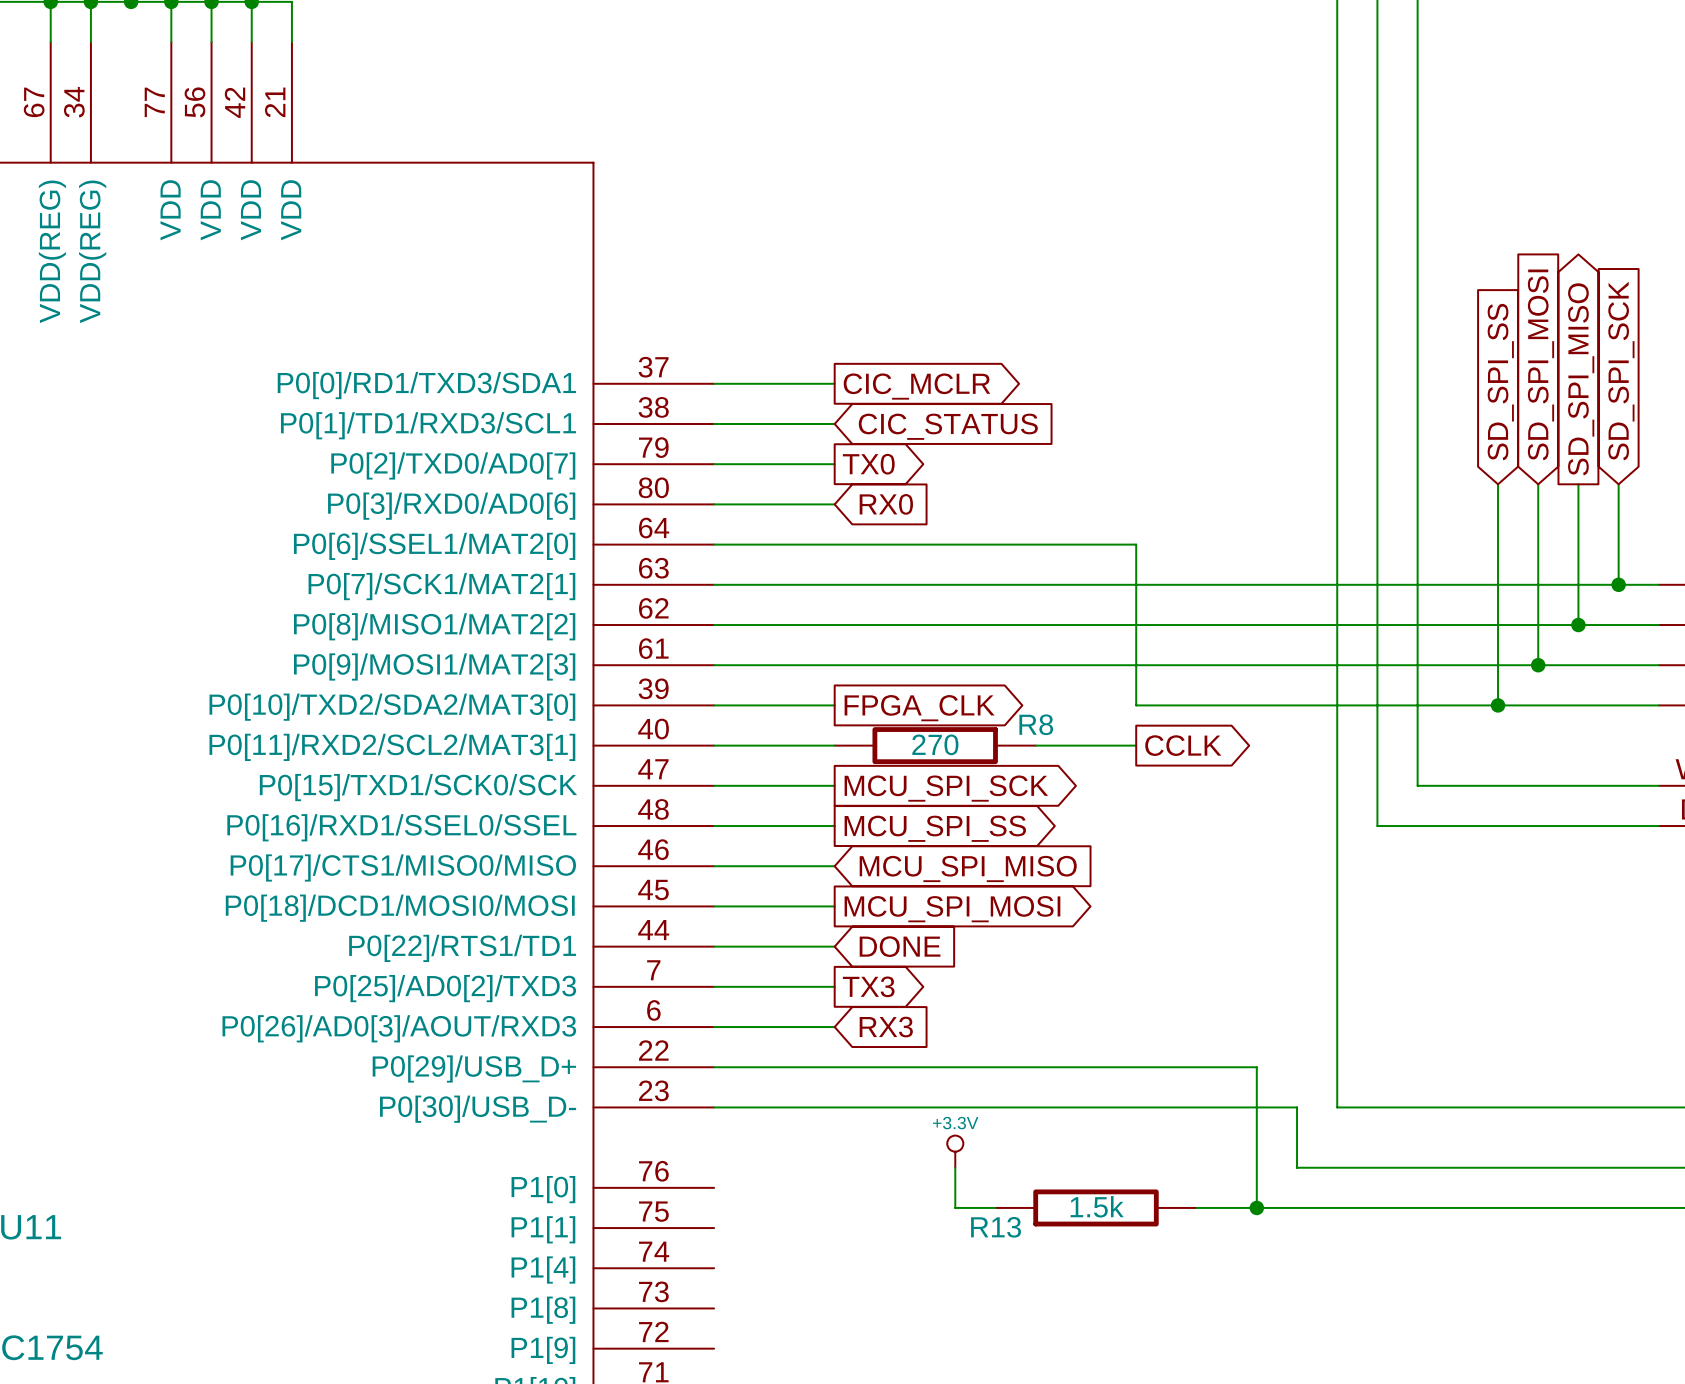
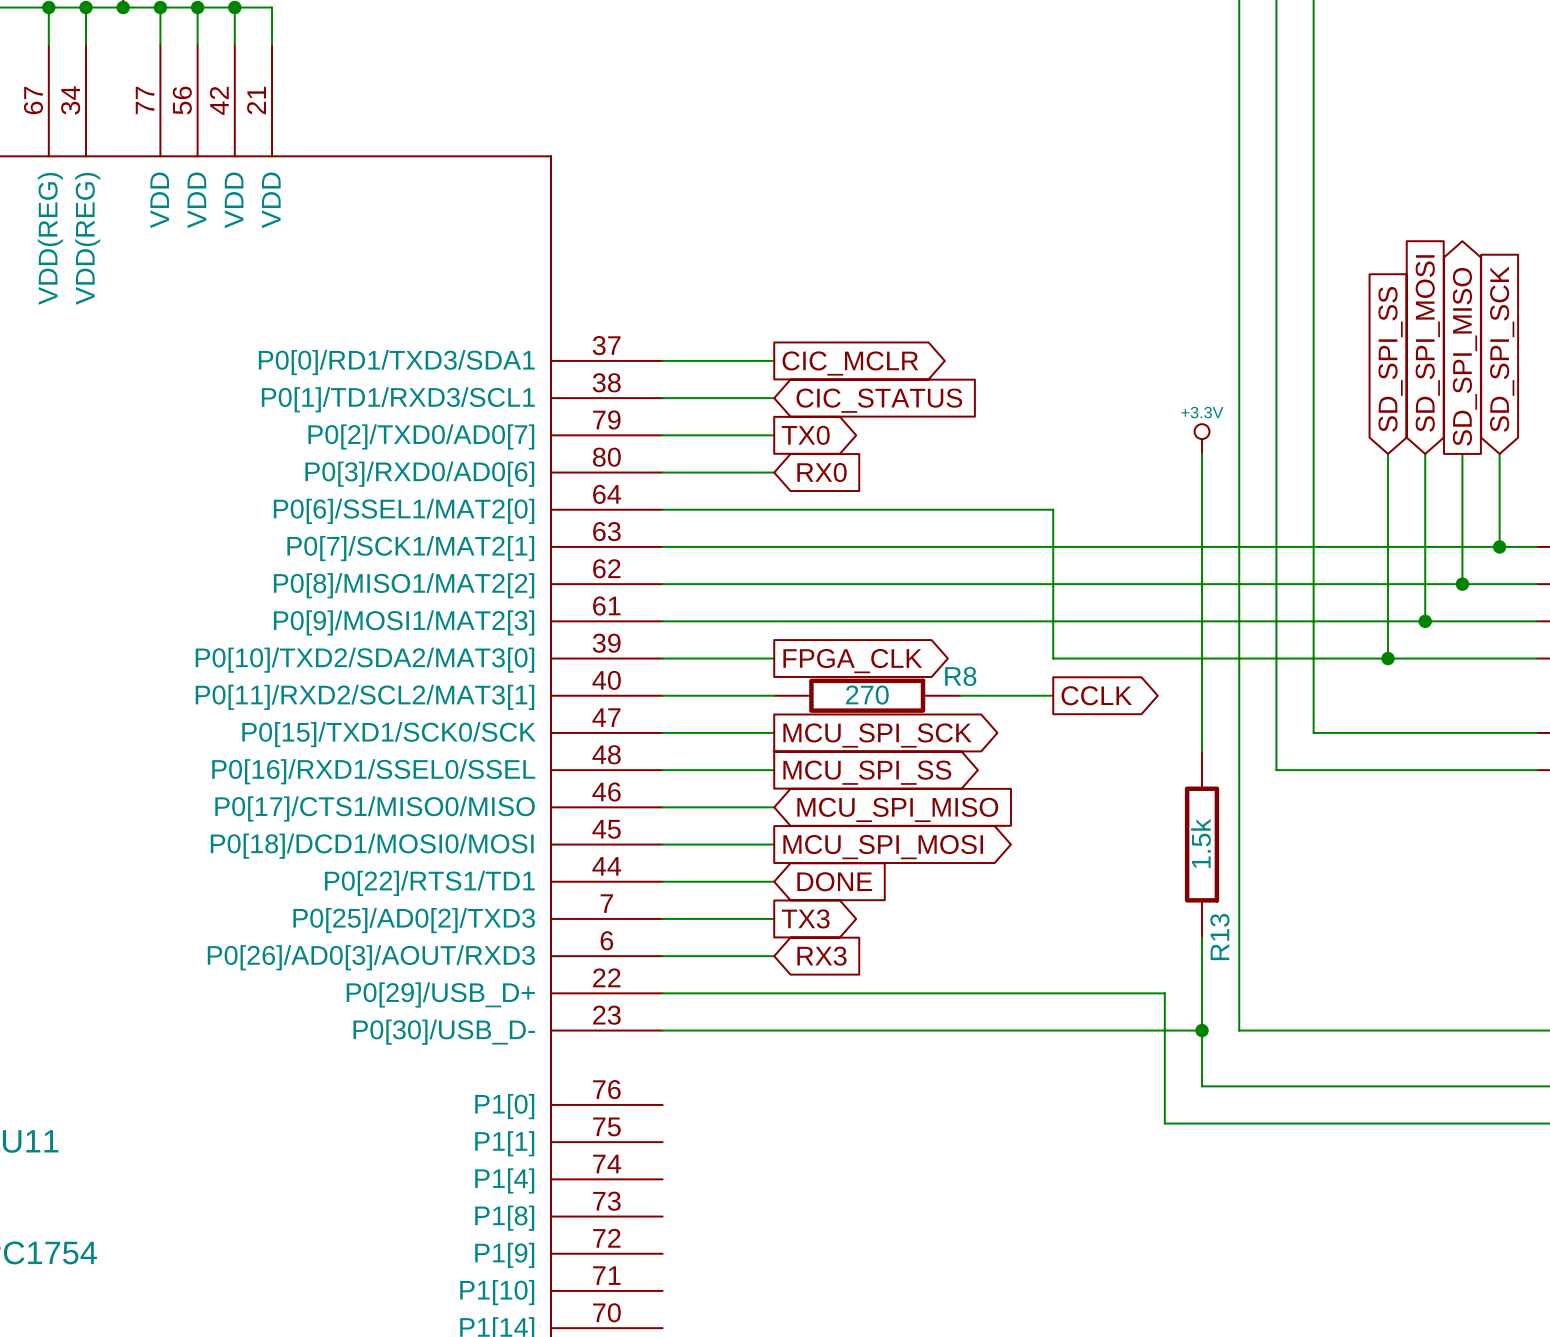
power symbol: none -> +3.3V (1202, 439)
wire: none -> (1202, 453) (1202, 751)
wire: none -> (1202, 937) (1202, 1030)
junction: none -> (1202, 1030)
power symbol: +3.3V (955, 1151) -> none
wire: (955, 1167) (955, 1207) (995, 1207) -> none
R13 rotation: 0° (1096, 1207) -> 90° clockwise (1202, 844)
R13 position: (1096, 1207) -> (1202, 844)
wire: (1196, 1207) (1256, 1207) -> none
junction: (1256, 1207) -> none
R13 name position: R13 (996, 1227) -> R13 (1219, 937)

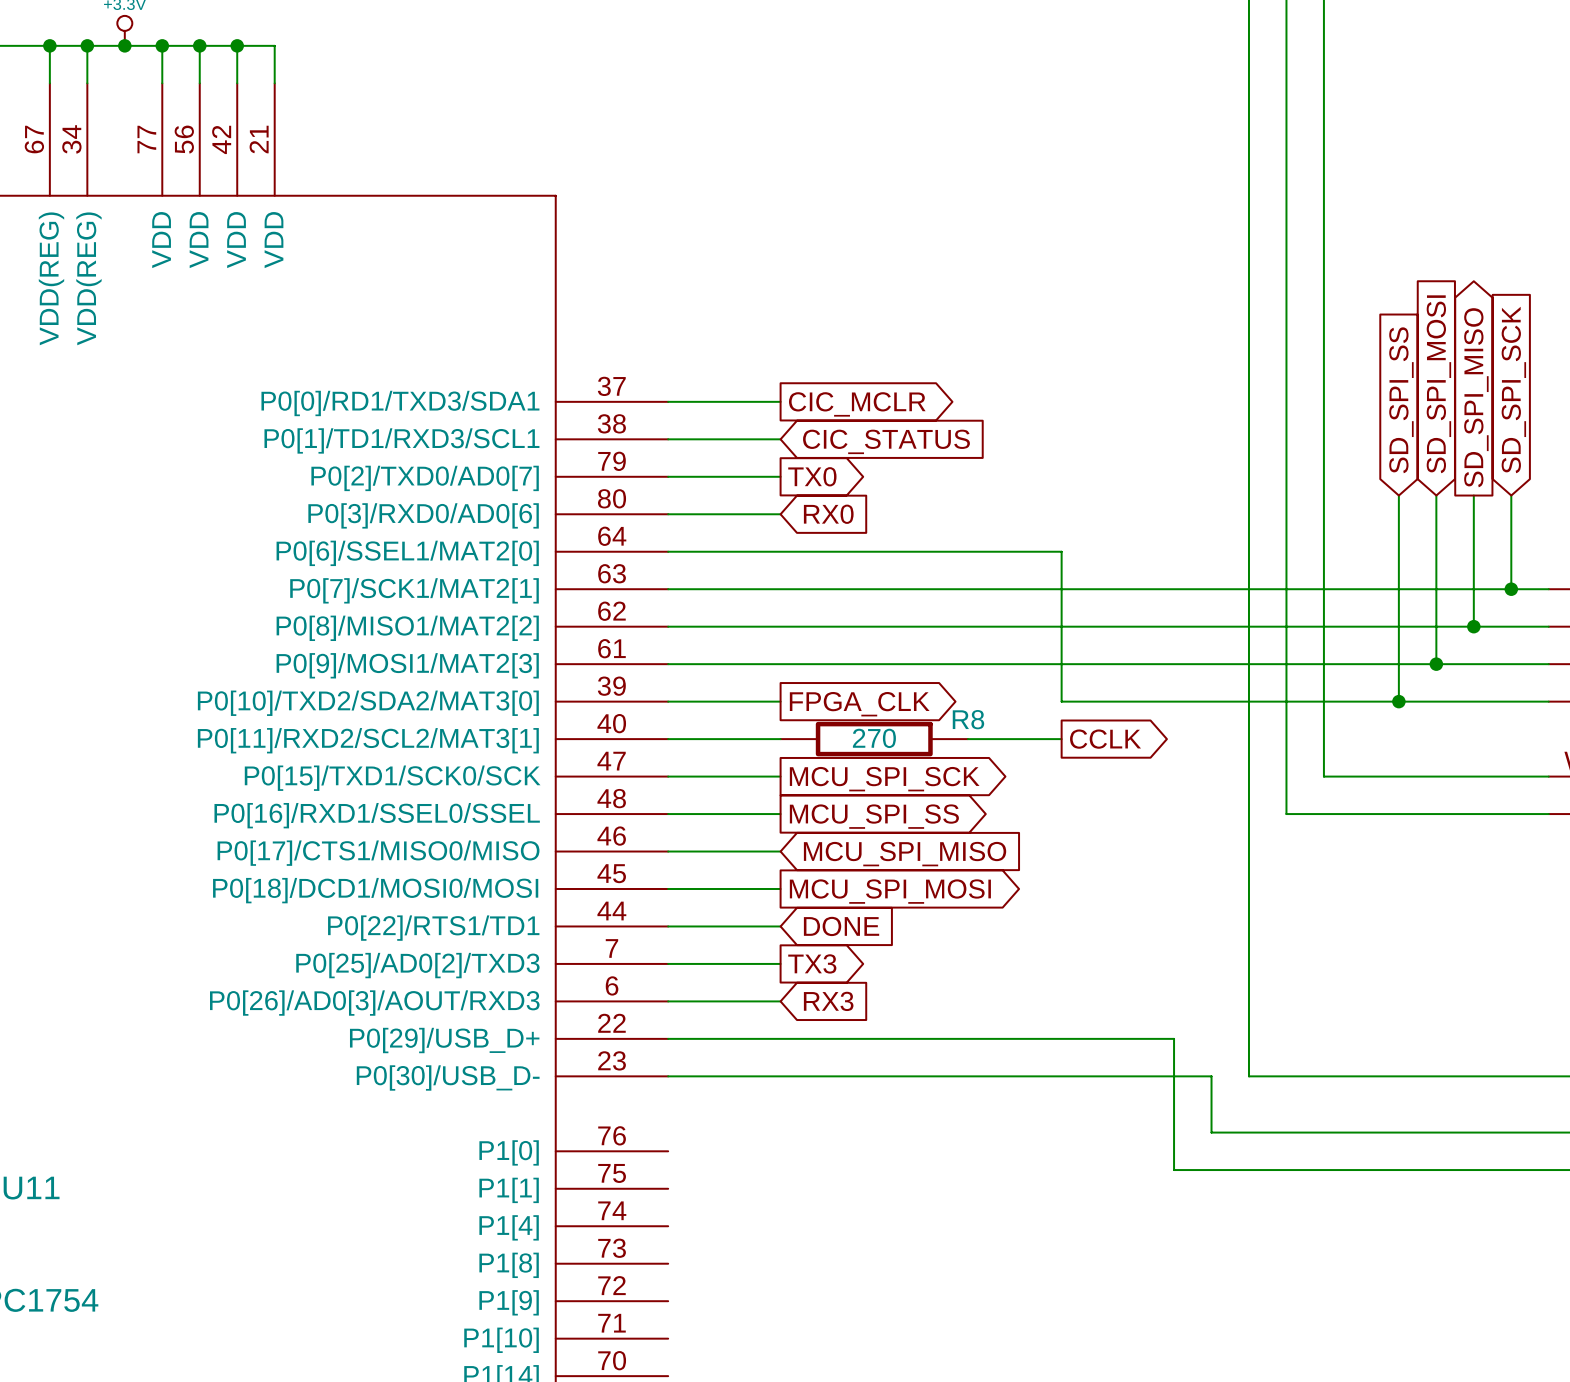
power symbol: +3.3V (1202, 439) -> none
wire: (1202, 453) (1202, 751) -> none
R13: 1.5k (1202, 844) -> none
wire: (1202, 937) (1202, 1030) -> none
junction: (1202, 1030) -> none

